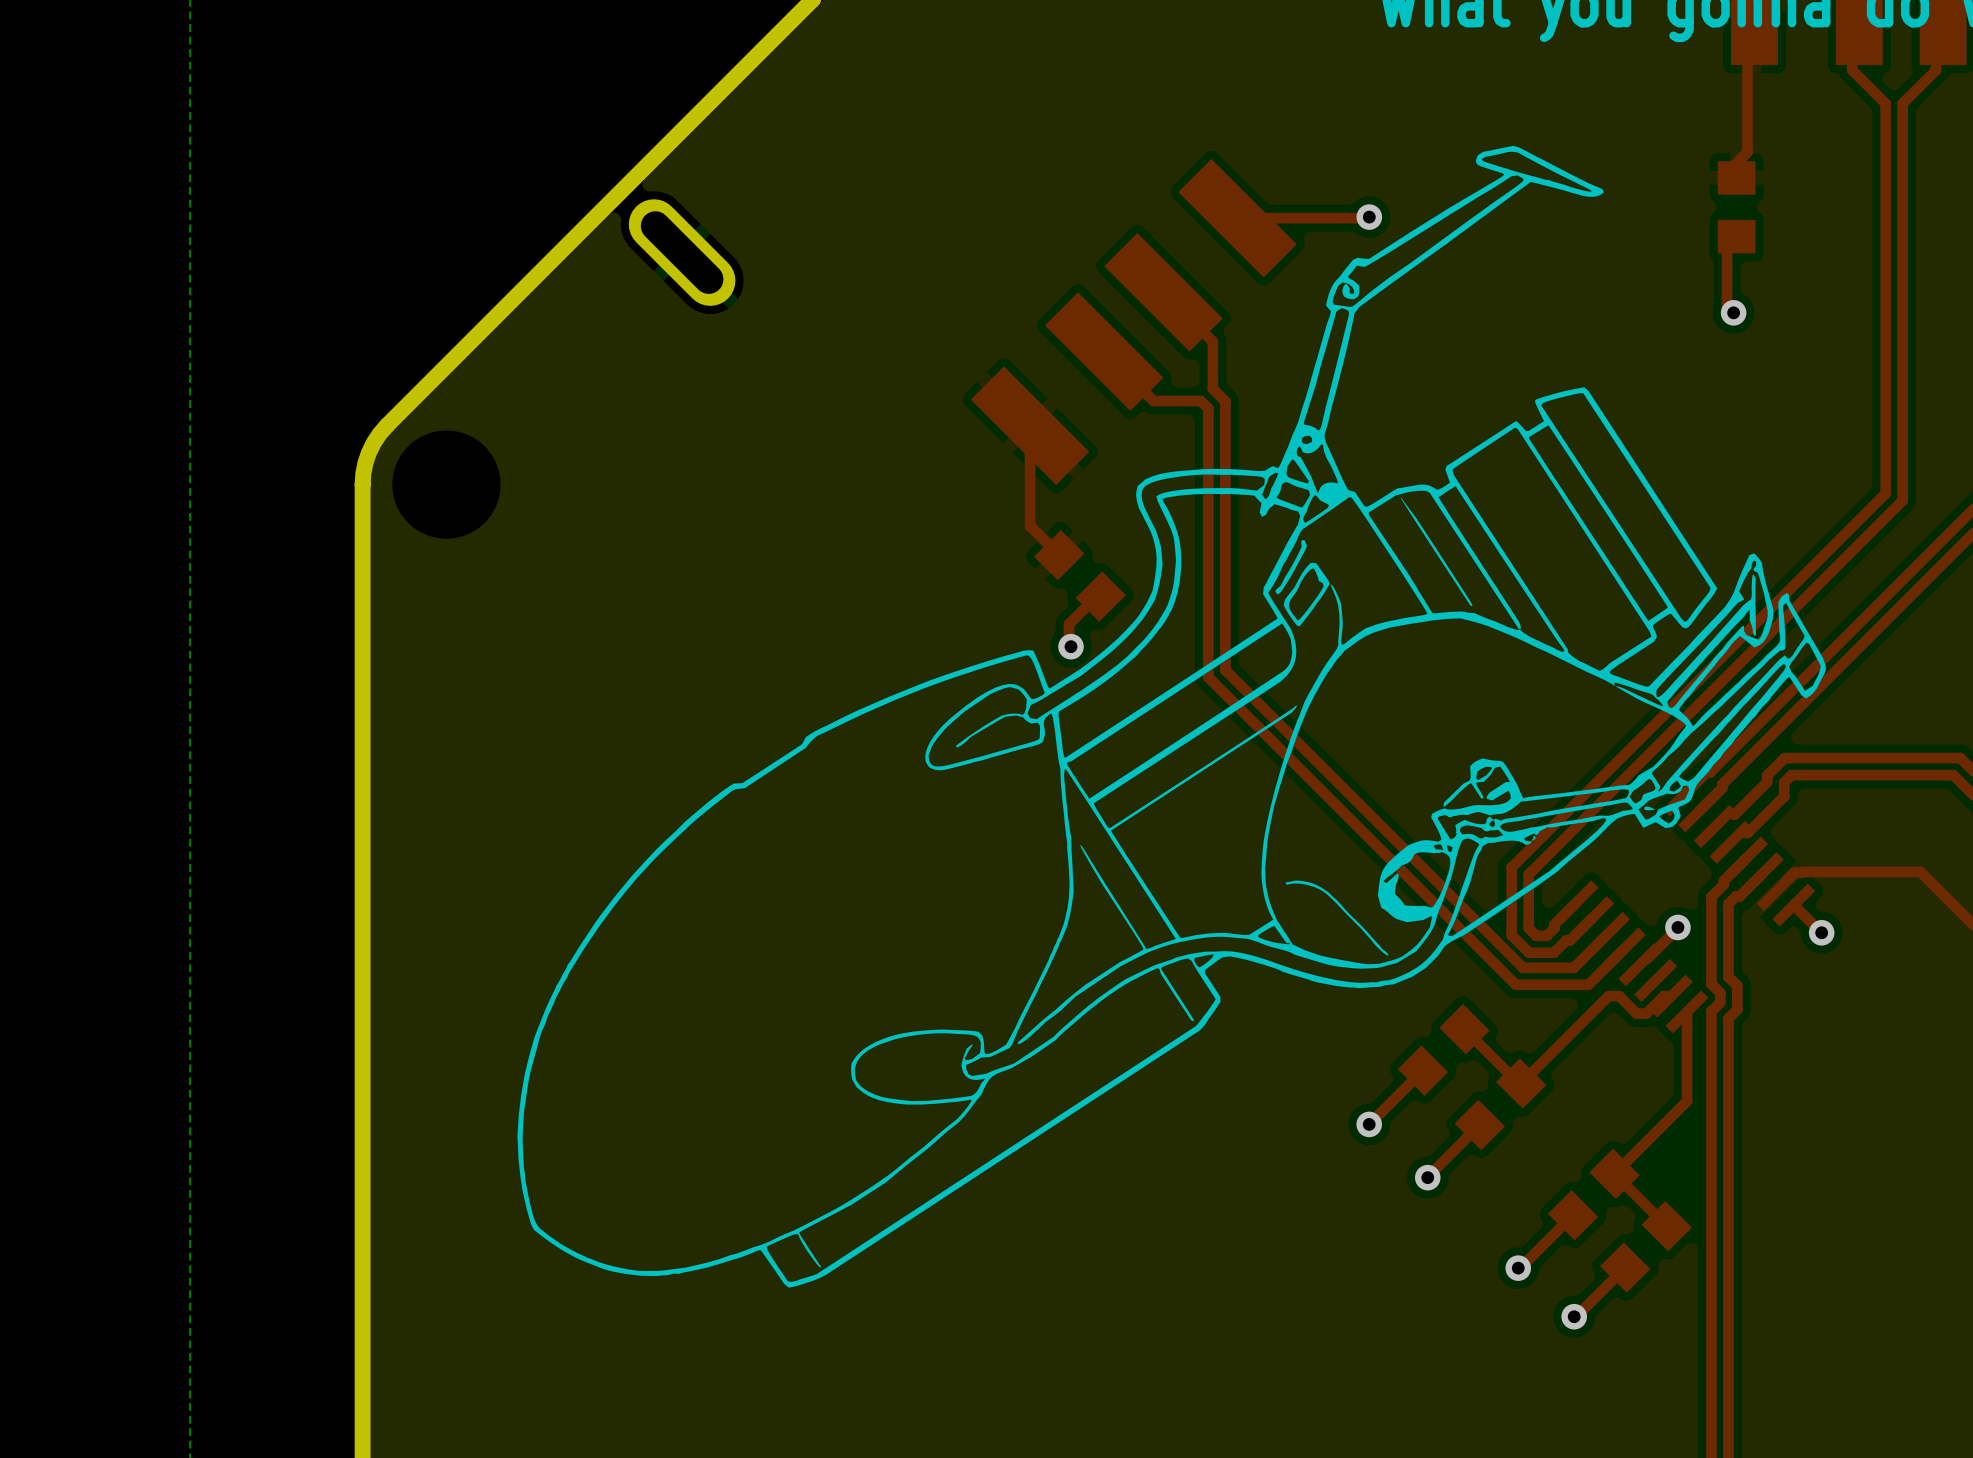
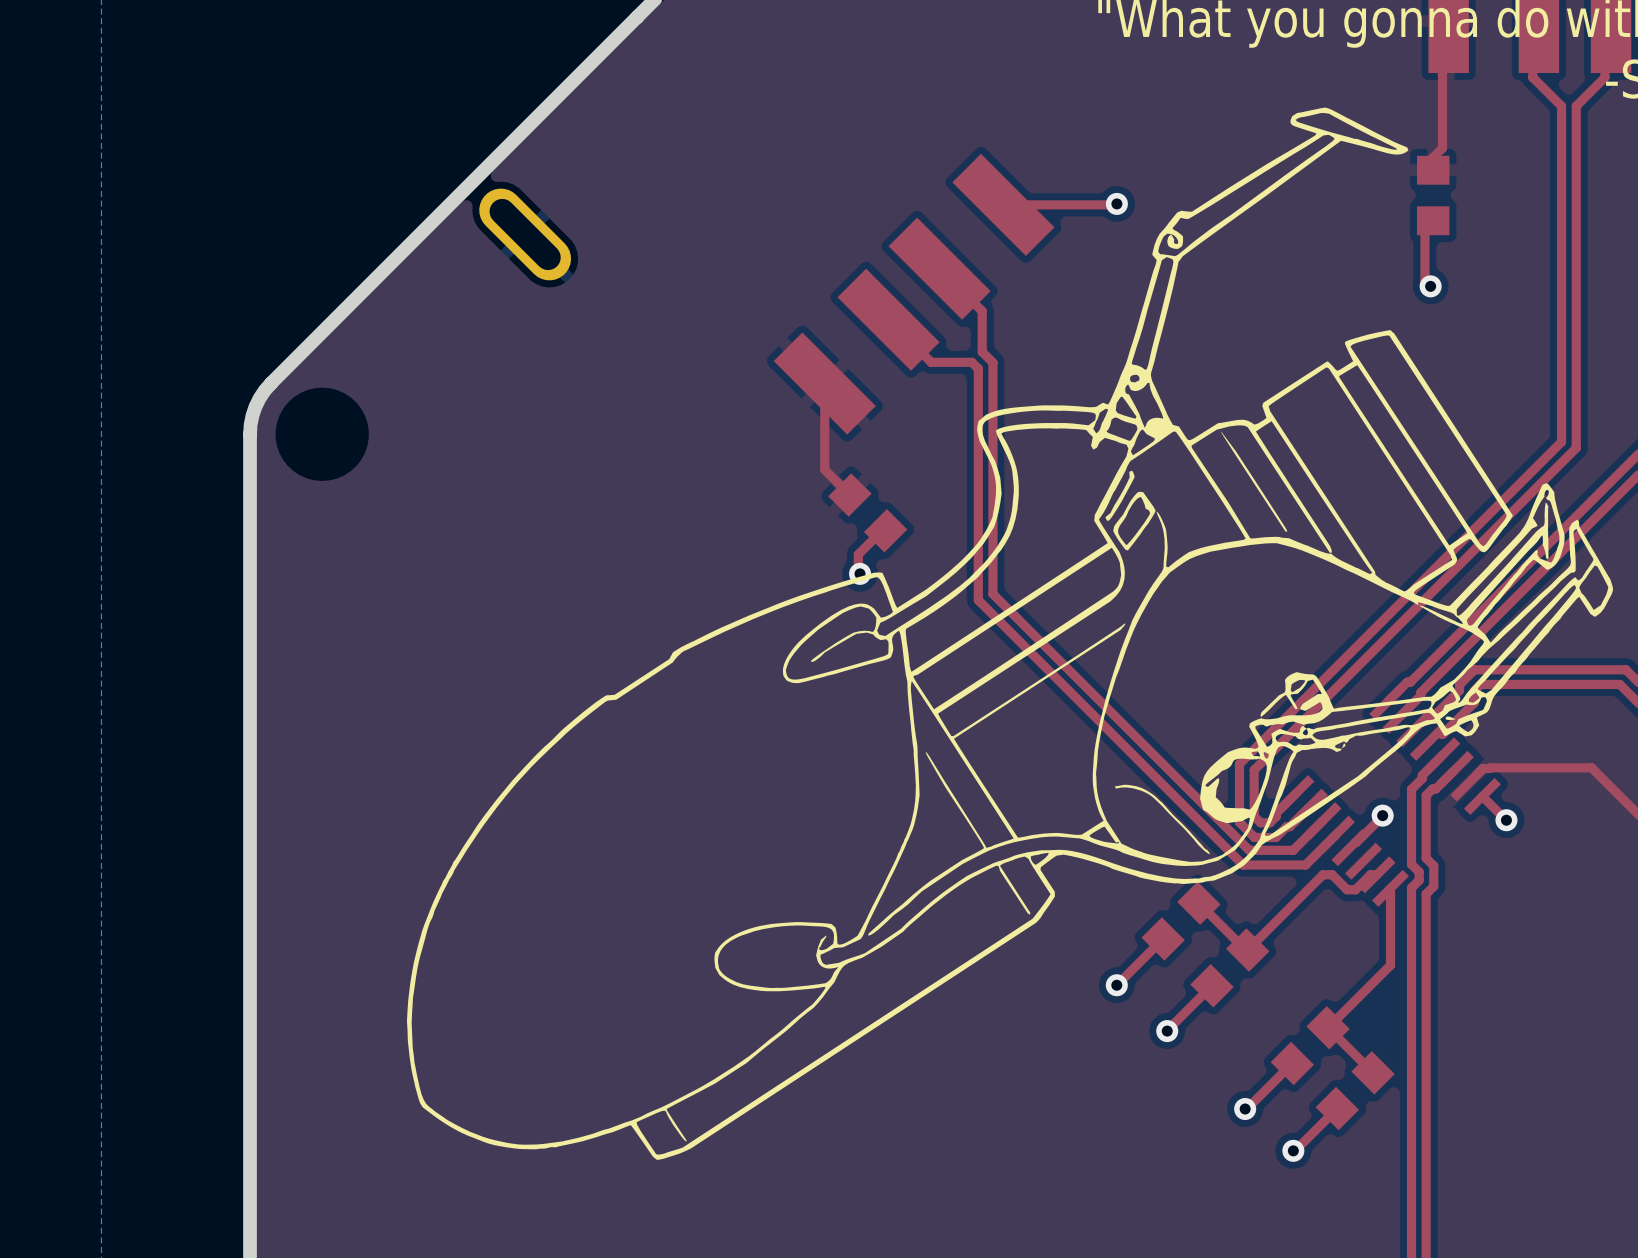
drawing: none -> [406, 107, 1613, 1160]
drawing: [517, 145, 1826, 1288] -> none
drawing position: (1649, 808) -> (1450, 718)
drawing position: (1533, 838) -> (1343, 745)

